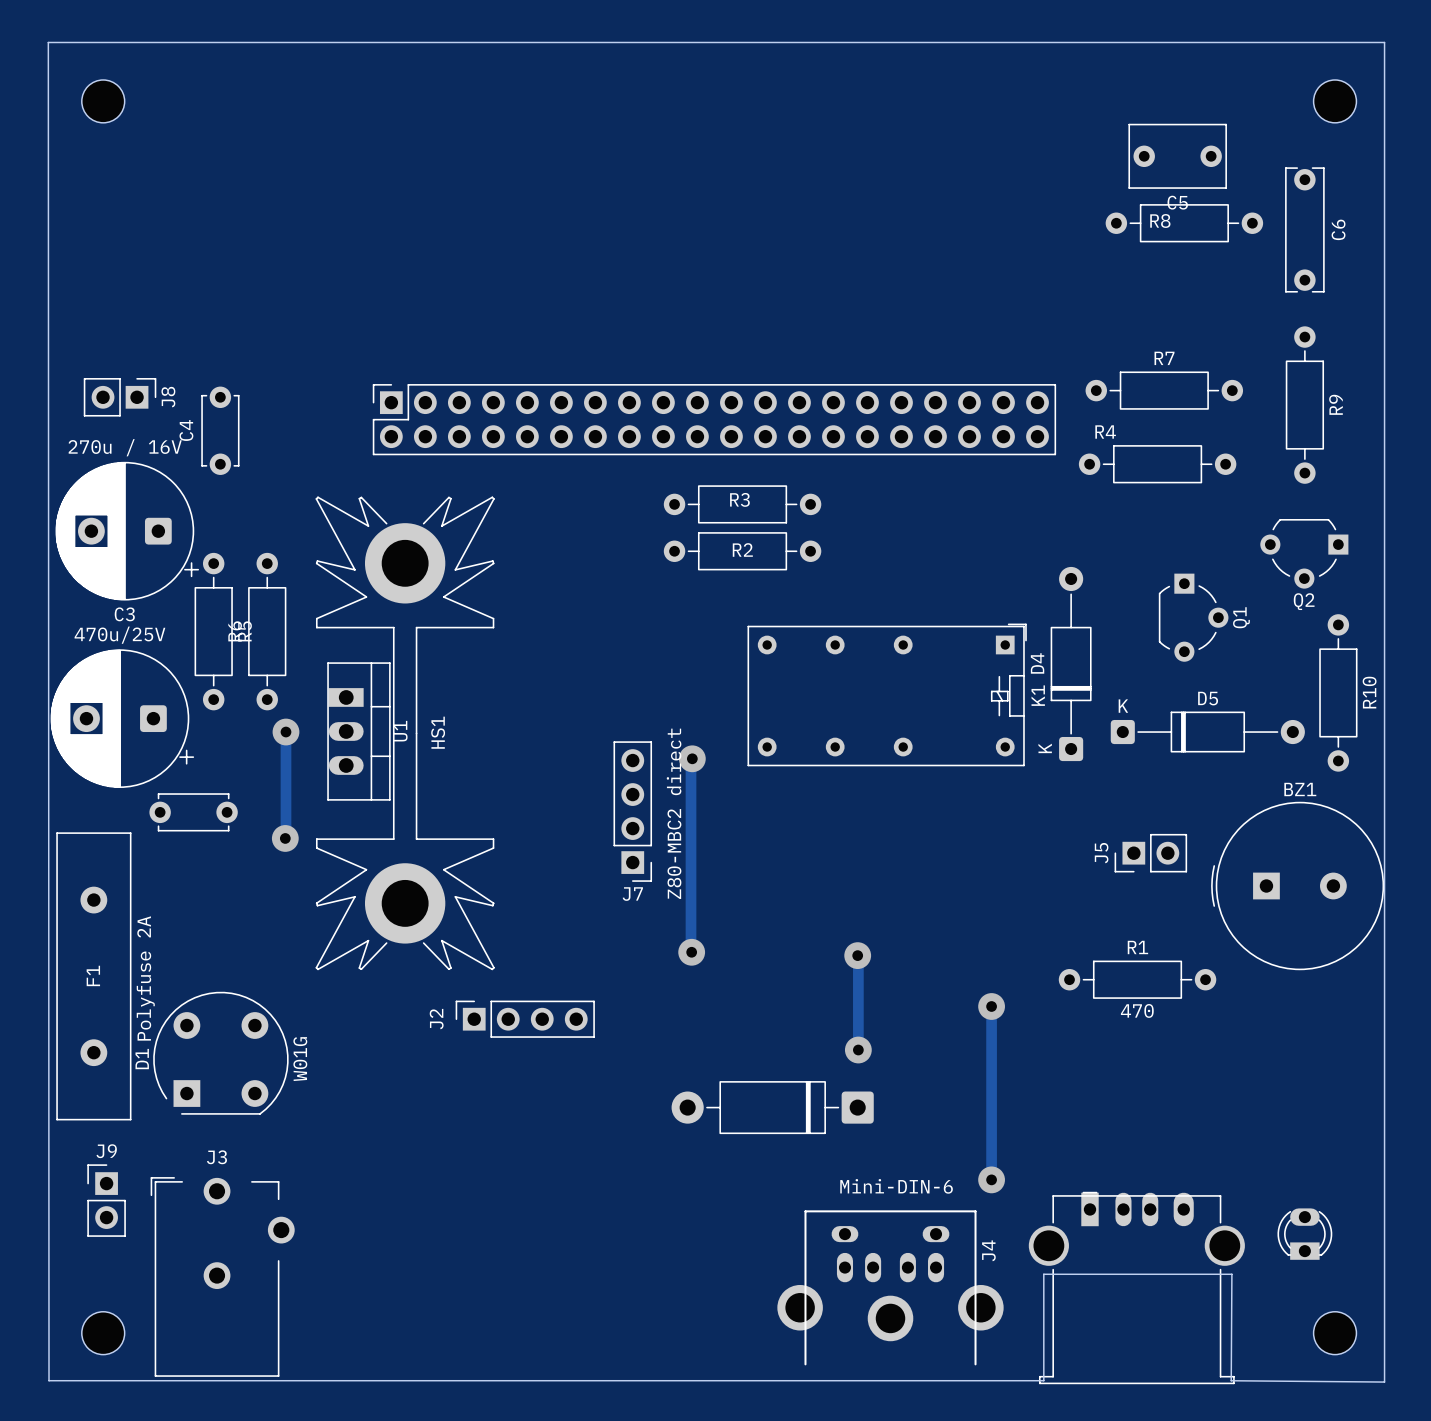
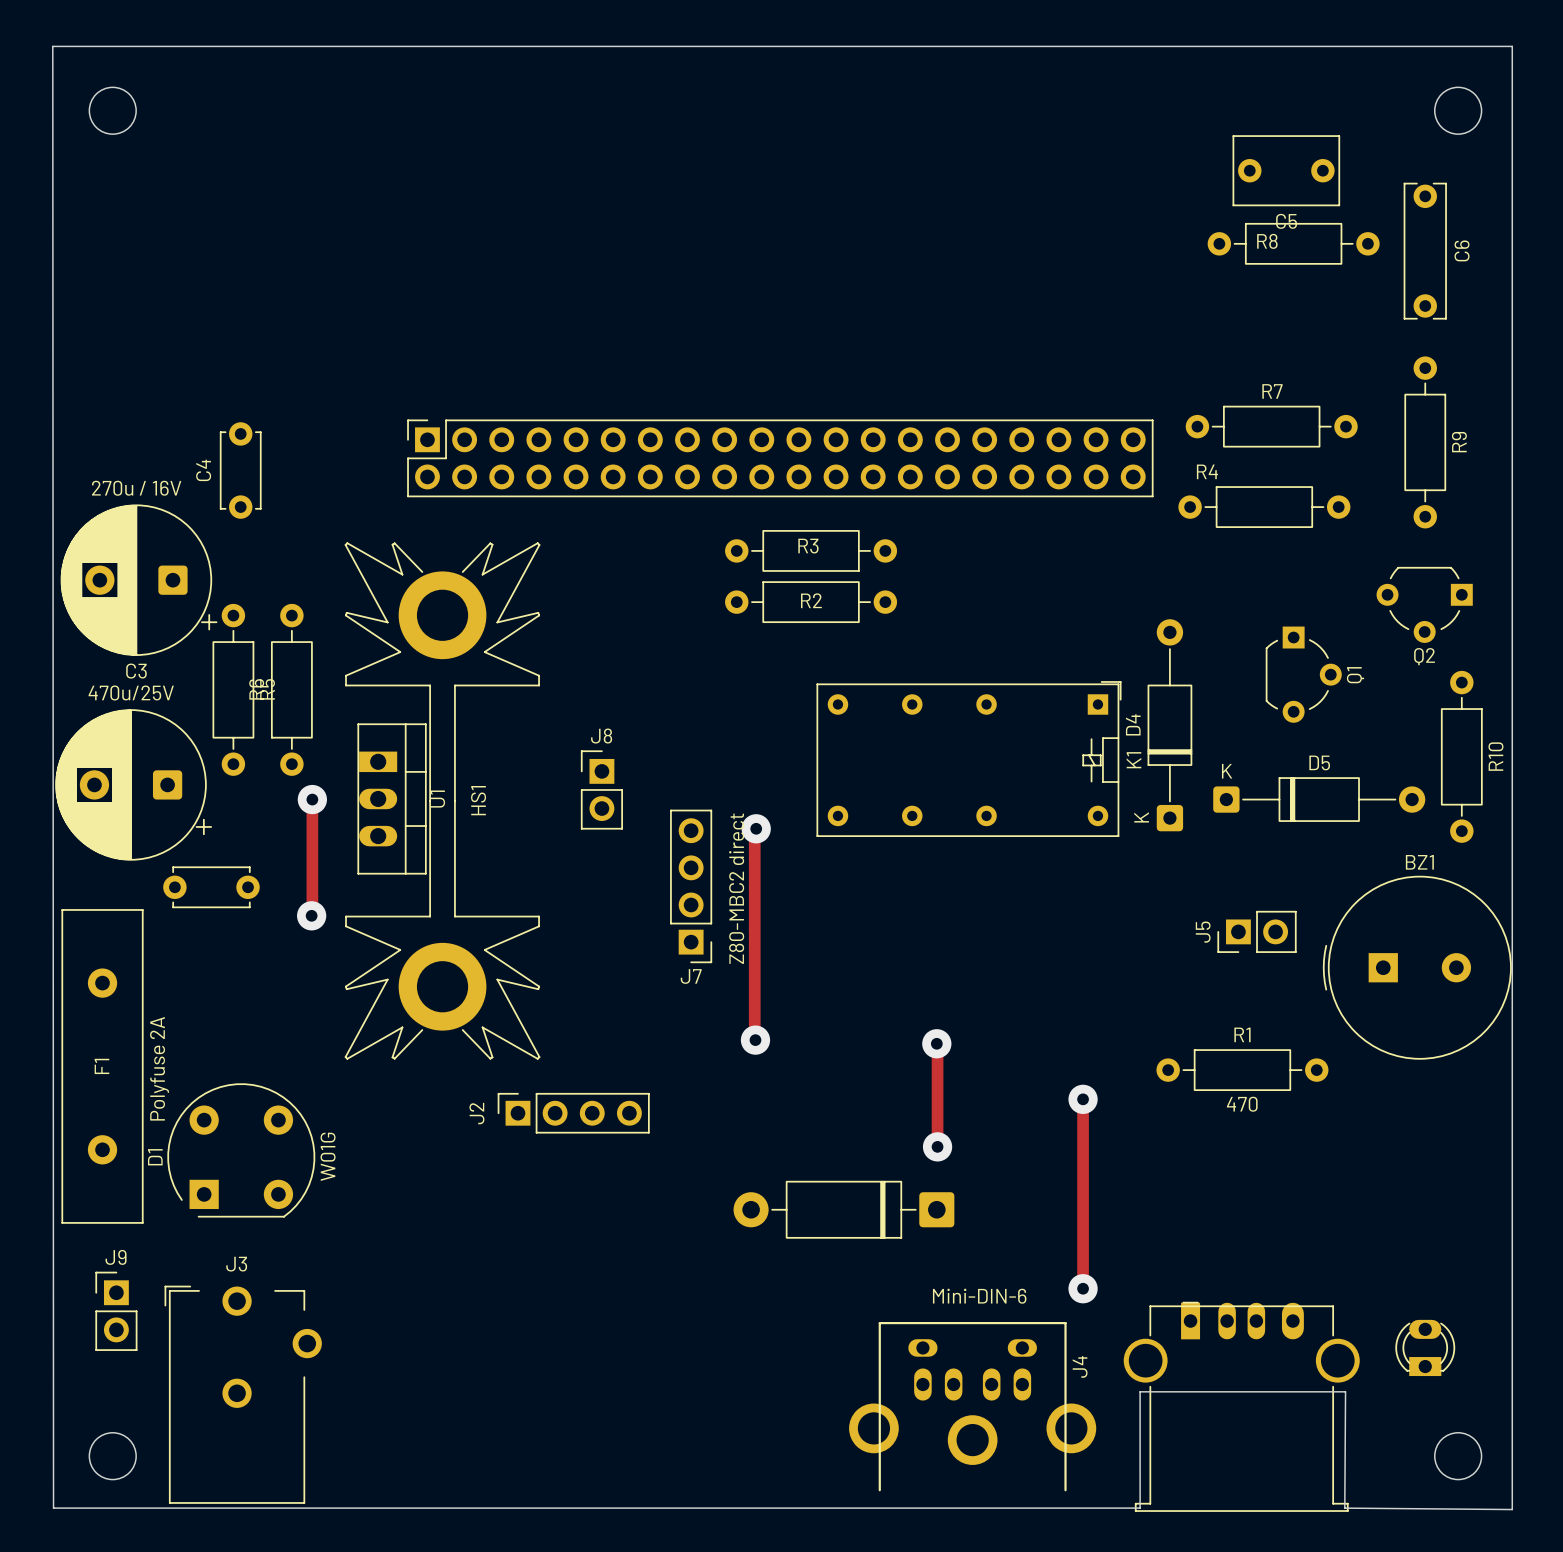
J8 rotation: 0° (120, 397) -> 90° counterclockwise (601, 789)
J8 position: (120, 397) -> (601, 789)

